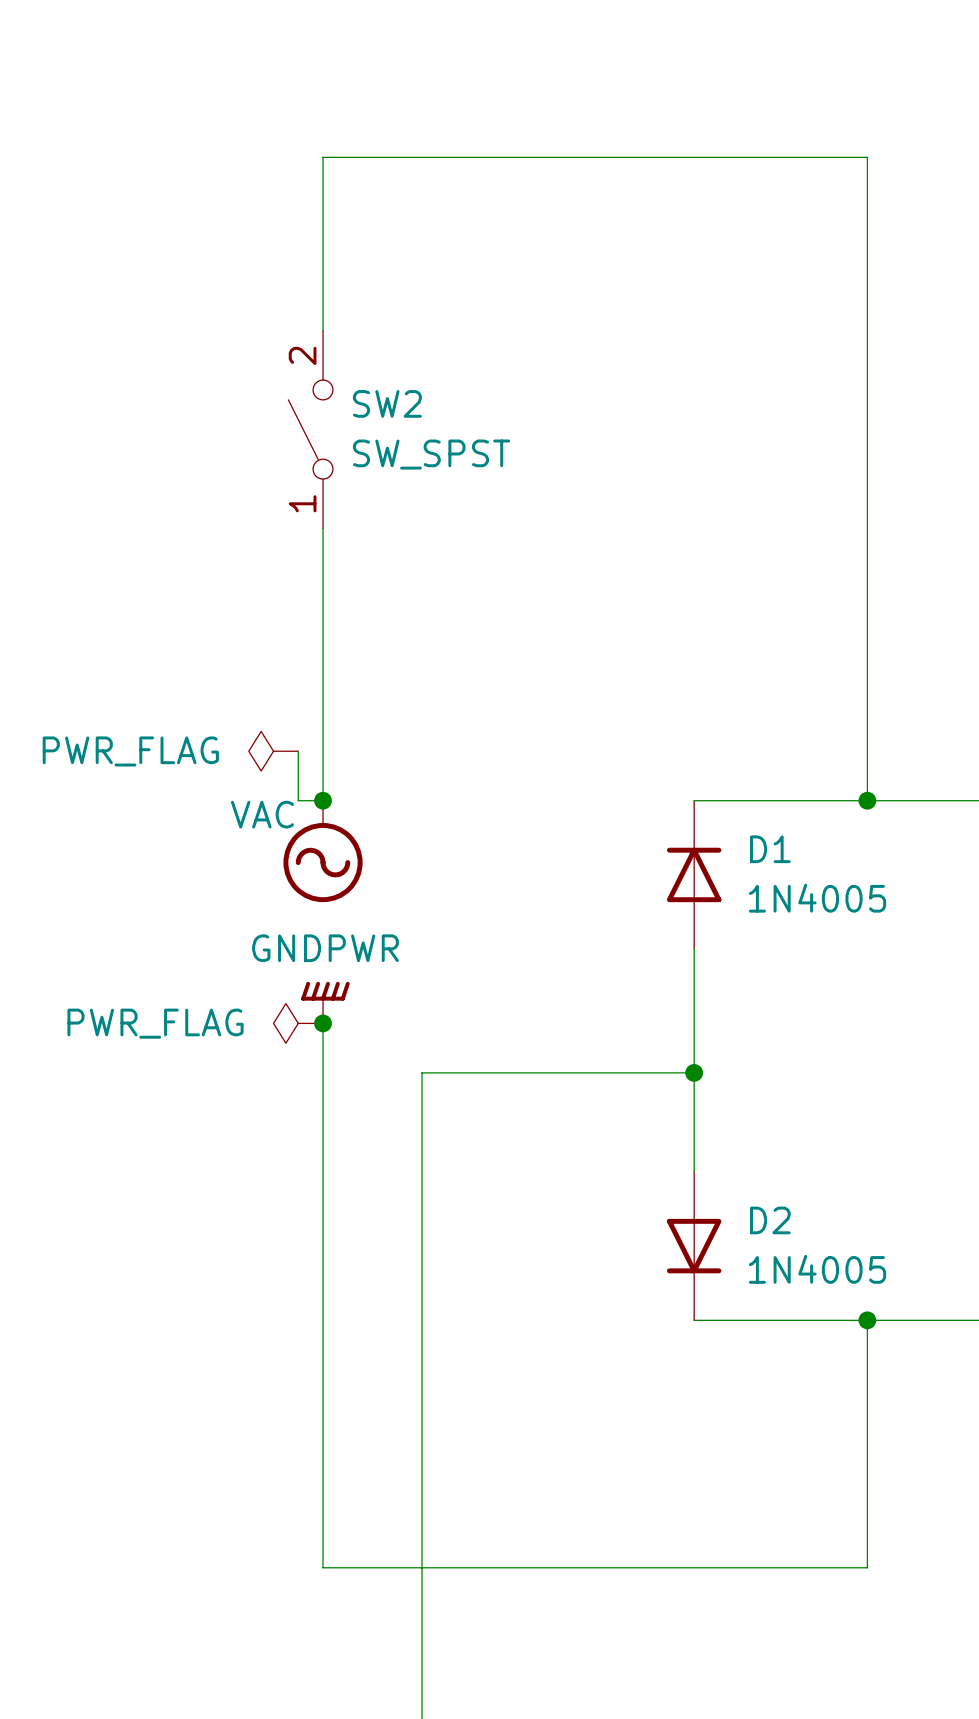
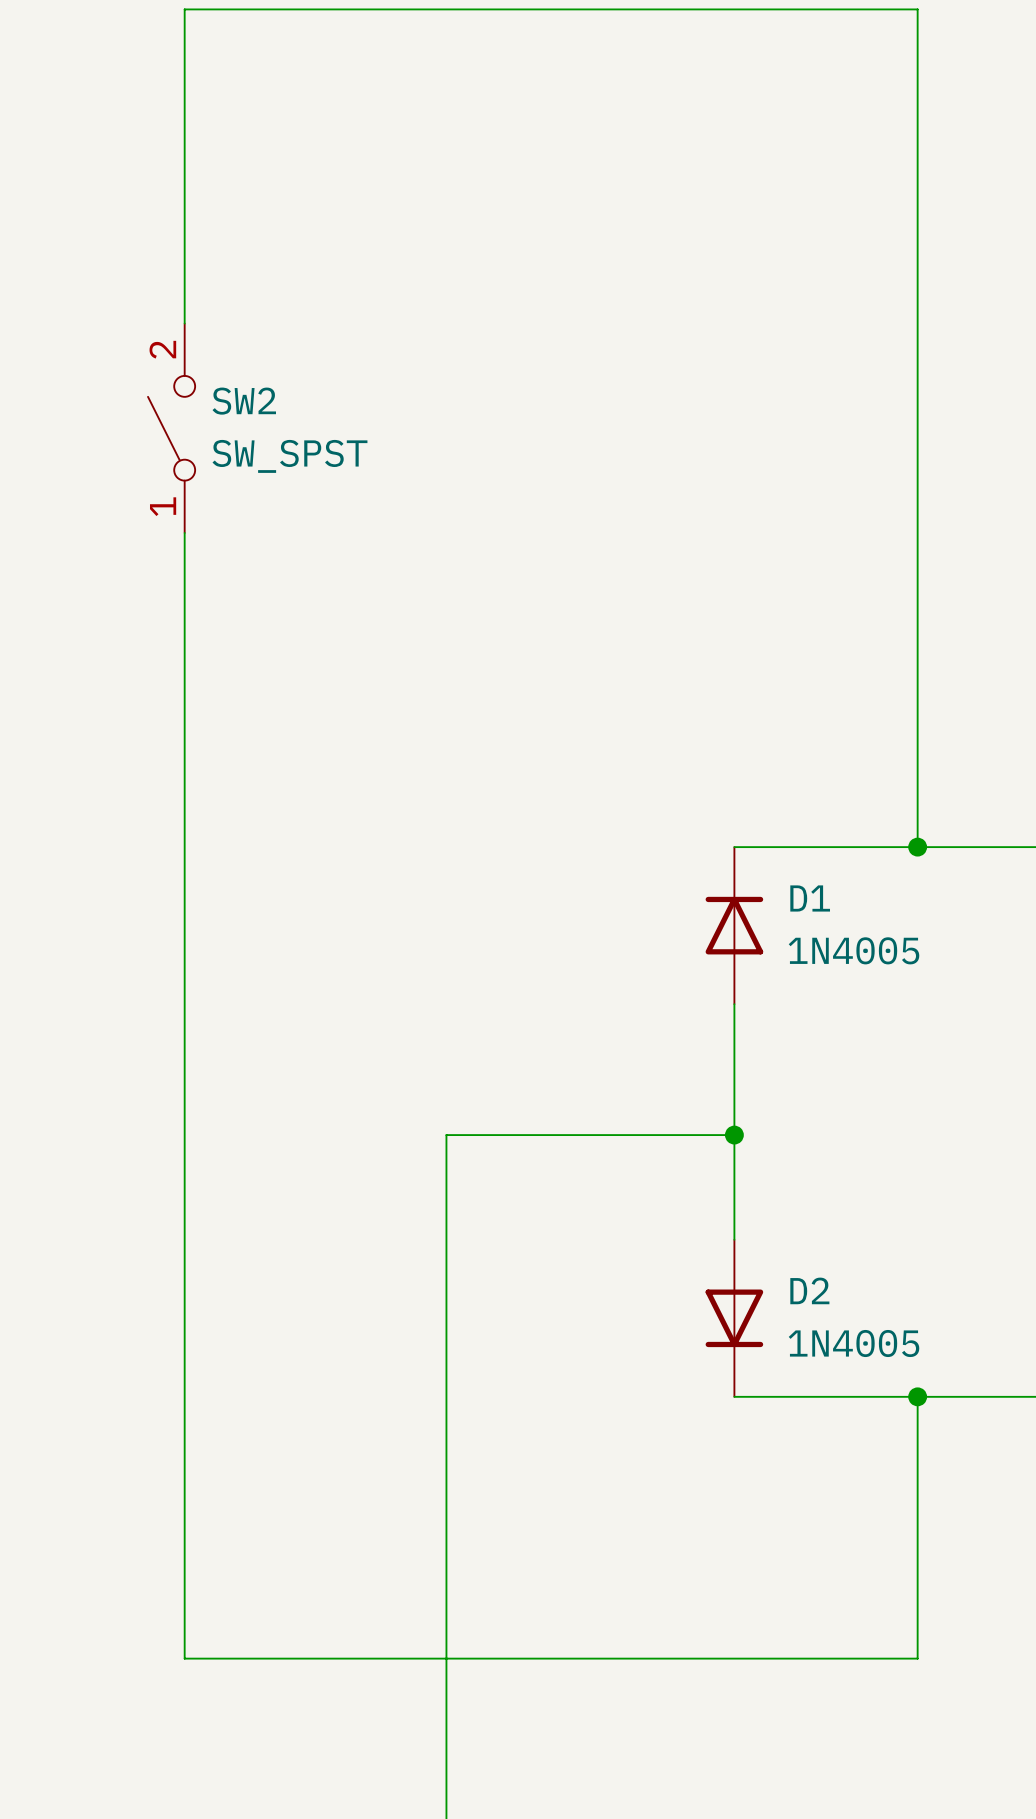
wire: (867, 157) (323, 157) (323, 330) -> (917, 166) (917, 9) (184, 9) (184, 323)
SW2 position: (310, 429) -> (171, 428)
wire: (323, 528) (323, 800) (298, 800) (298, 751) -> none
power symbol: PWR_FLAG (273, 751) -> none
junction: (323, 800) -> none
power symbol: VAC (323, 851) -> none
power symbol: GNDPWR (325, 1002) -> none
power symbol: PWR_FLAG (298, 1023) -> none
wire: (323, 1023) (323, 1567) -> (184, 532) (184, 1658) (341, 1658)
junction: (323, 1023) -> none

